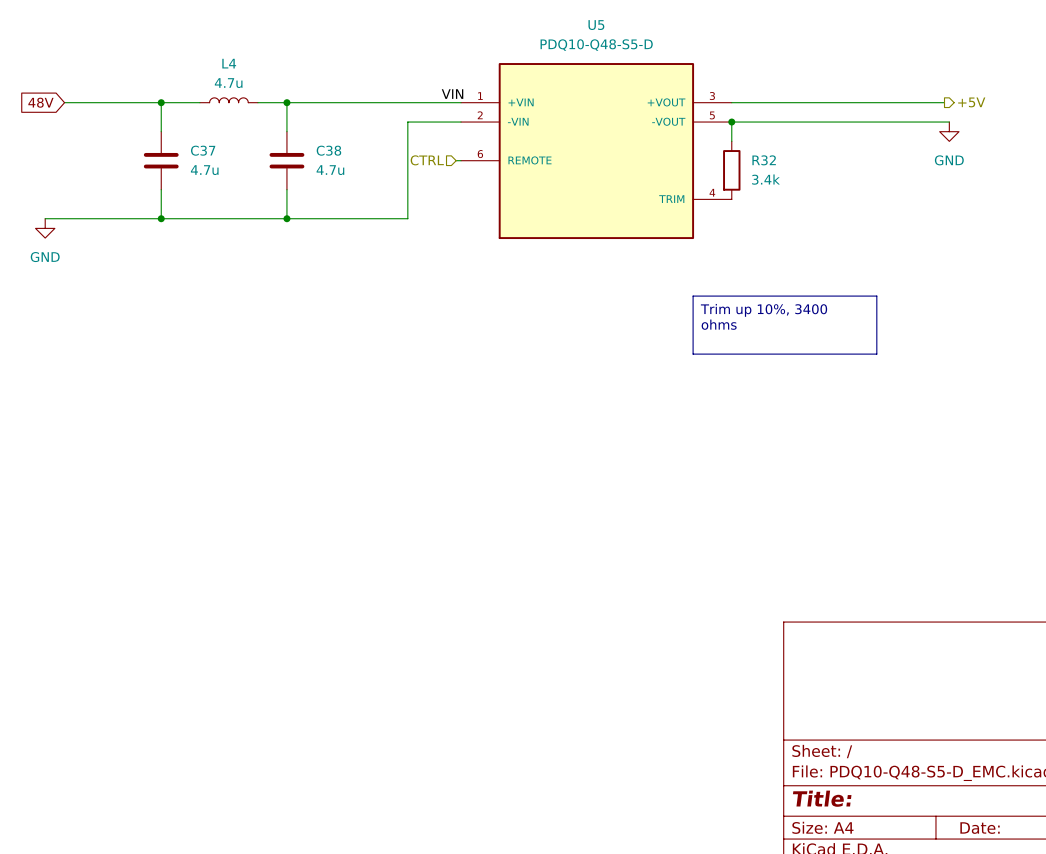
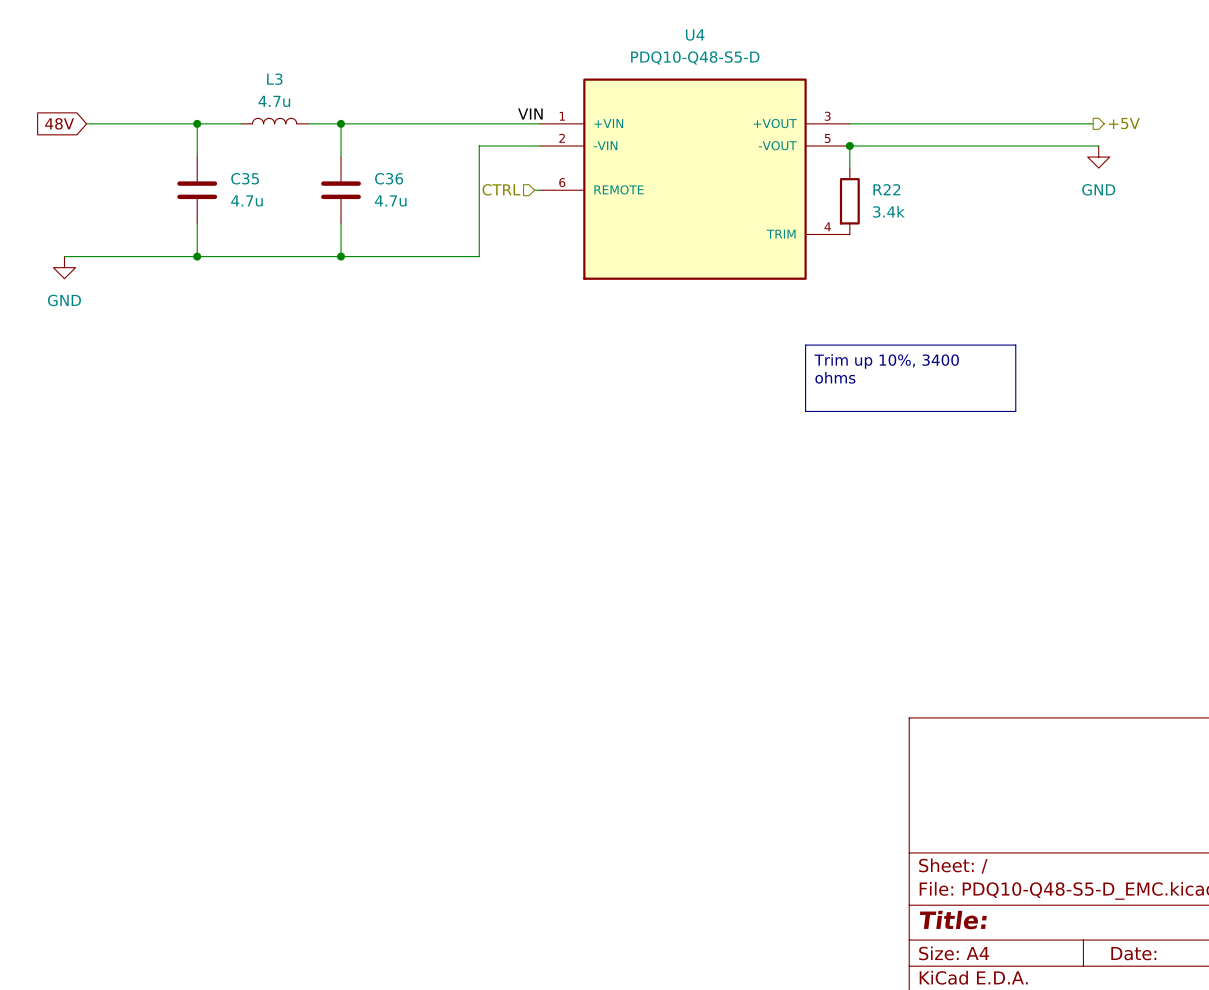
U5 name: U5 (596, 25) -> U4 (695, 35)
L4 name: L4 (229, 63) -> L3 (274, 79)
C37 name: C37 (203, 150) -> C35 (245, 178)
C38 name: C38 (328, 150) -> C36 (389, 178)
R32 name: R32 (764, 160) -> R22 (886, 189)

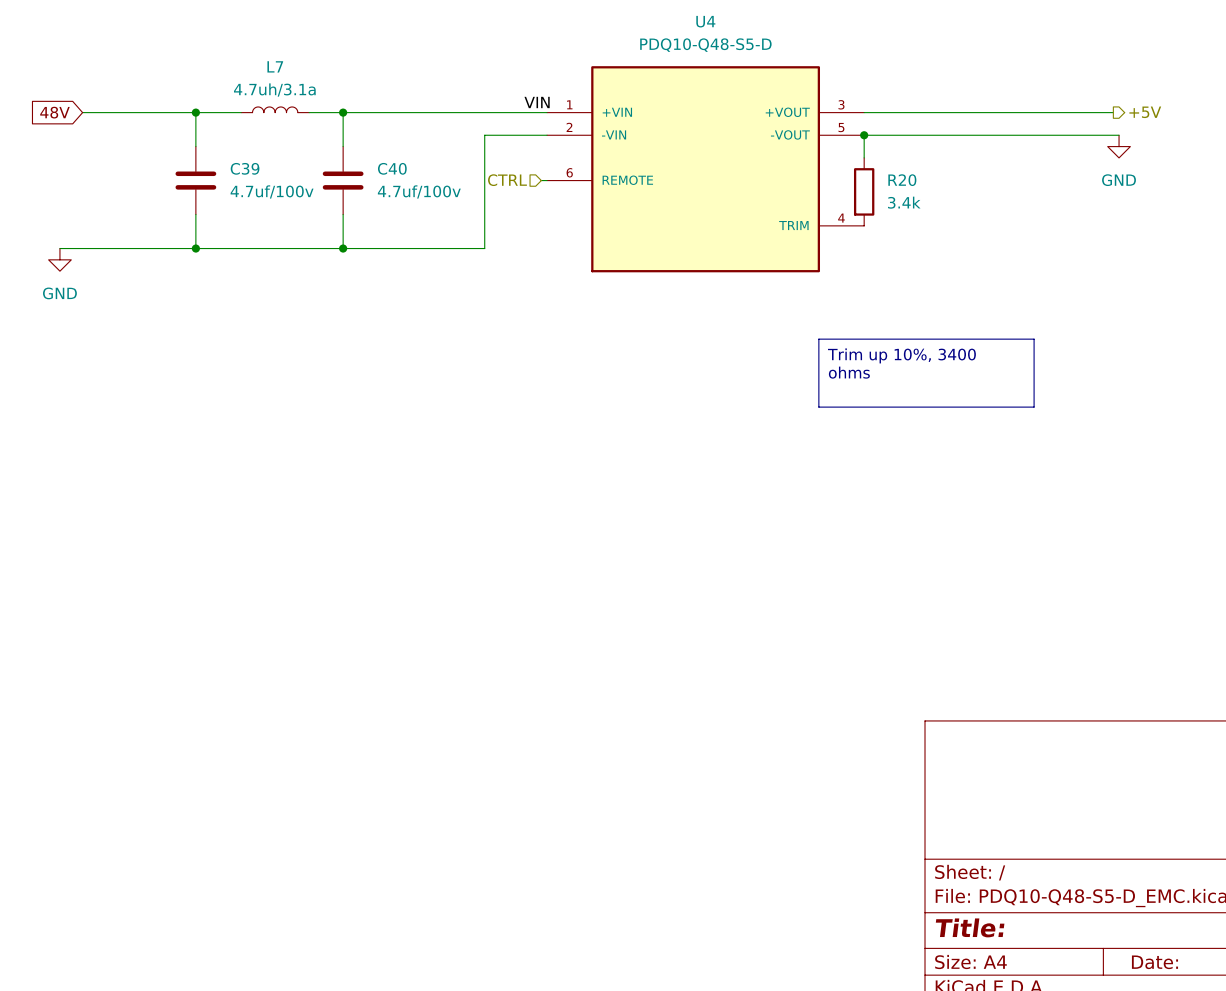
L3 name: L3 (274, 79) -> L7 (275, 66)
L3 value: 4.7u (274, 101) -> 4.7uh/3.1a (274, 90)
C35 name: C35 (245, 178) -> C39 (245, 168)
C36 name: C36 (389, 178) -> C40 (392, 168)
R22 name: R22 (886, 189) -> R20 (902, 180)
C35 value: 4.7u (246, 200) -> 4.7uf/100v (272, 191)
C36 value: 4.7u (390, 200) -> 4.7uf/100v (419, 191)

